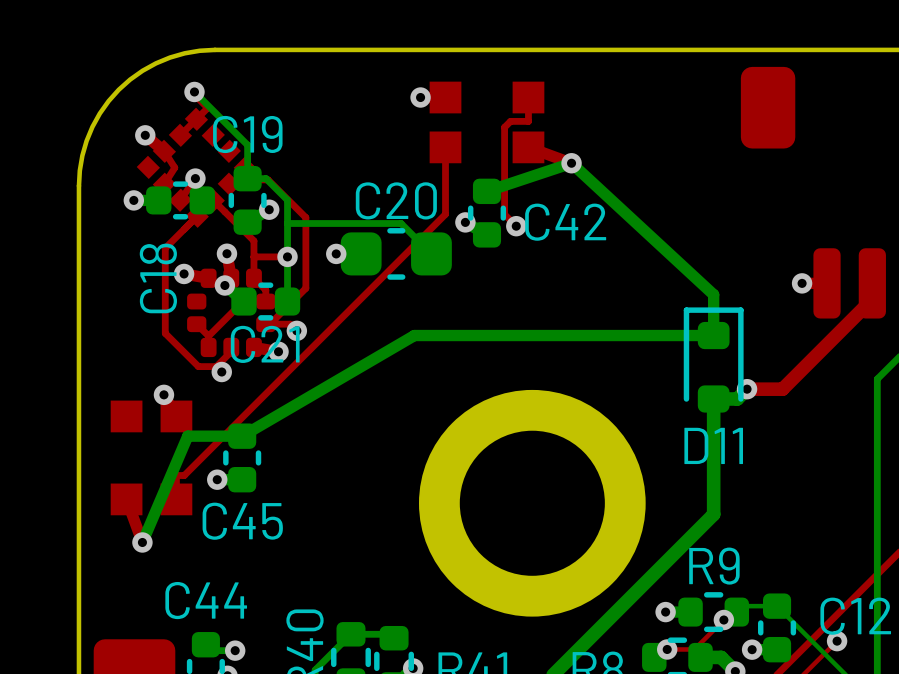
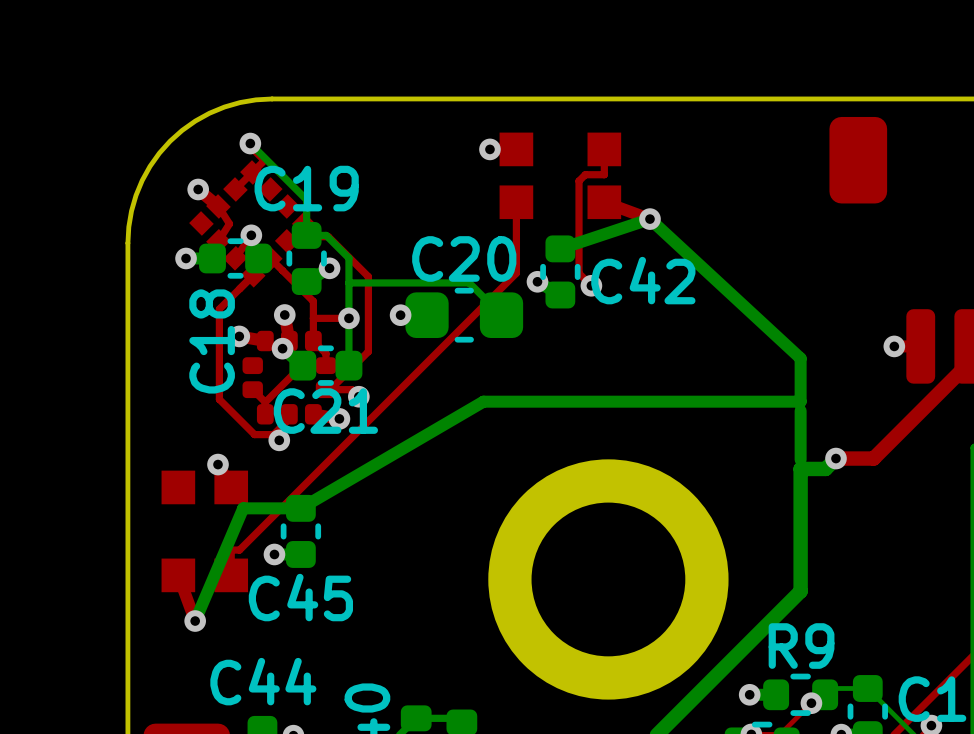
bottom track: none -> (800, 410) (800, 459)
D11: (713, 360) -> none

